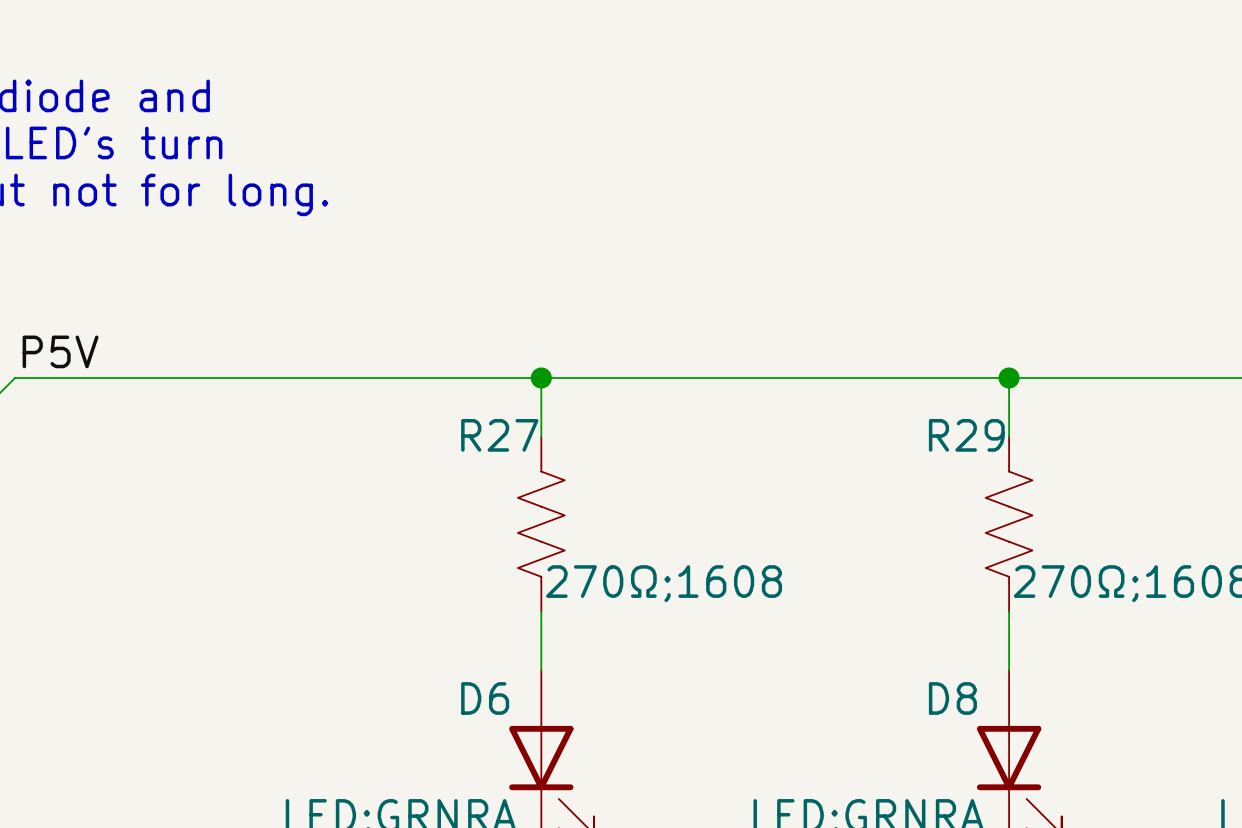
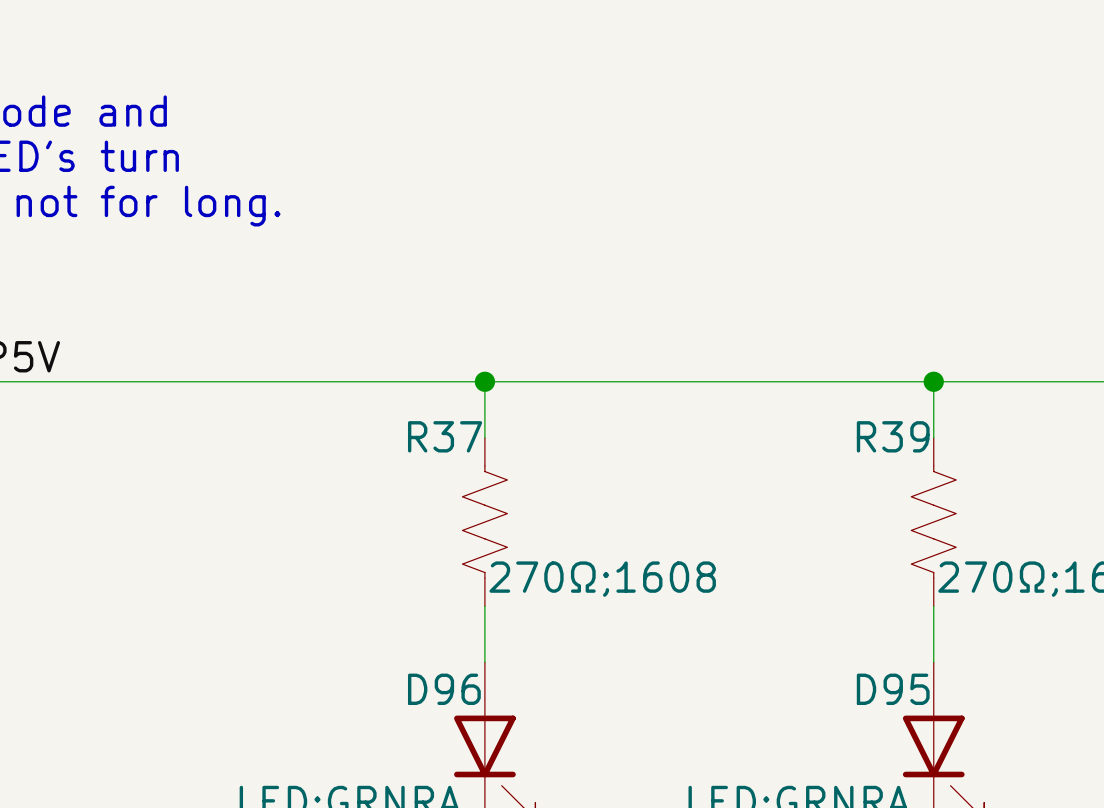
R27 name: R27 (499, 435) -> R37 (445, 436)
R29 name: R29 (966, 435) -> R39 (893, 436)
D6 name: D6 (485, 698) -> D96 (444, 689)
D8 name: D8 (952, 698) -> D95 (893, 689)

